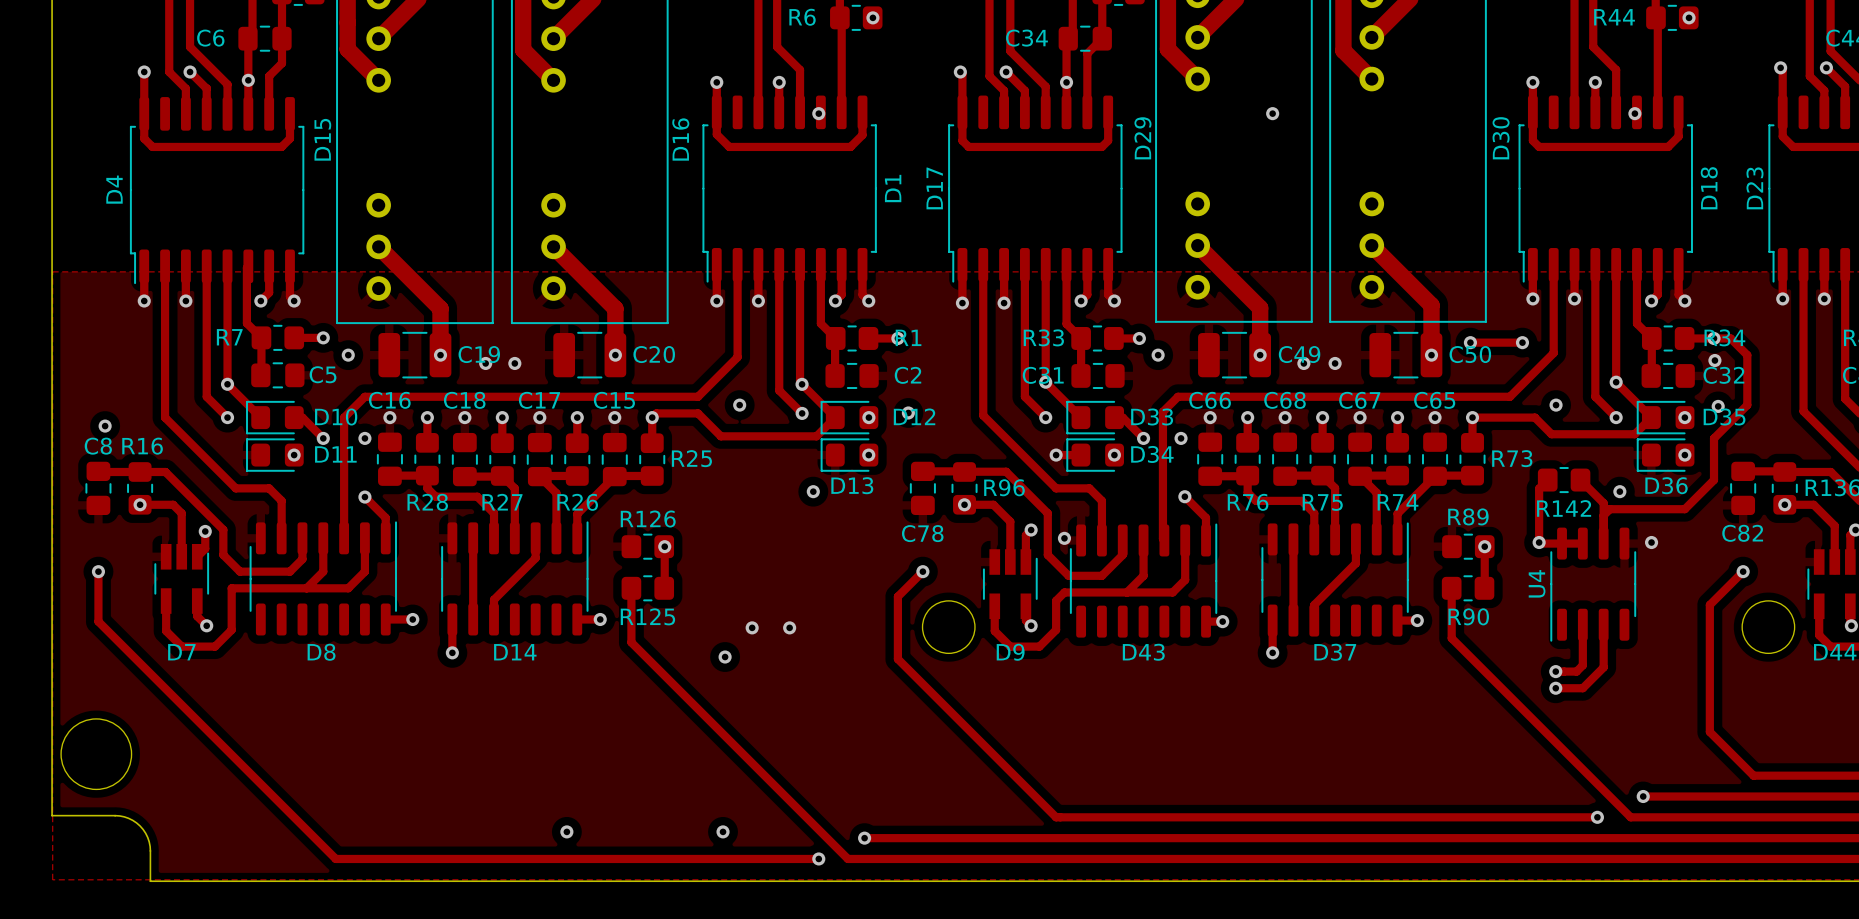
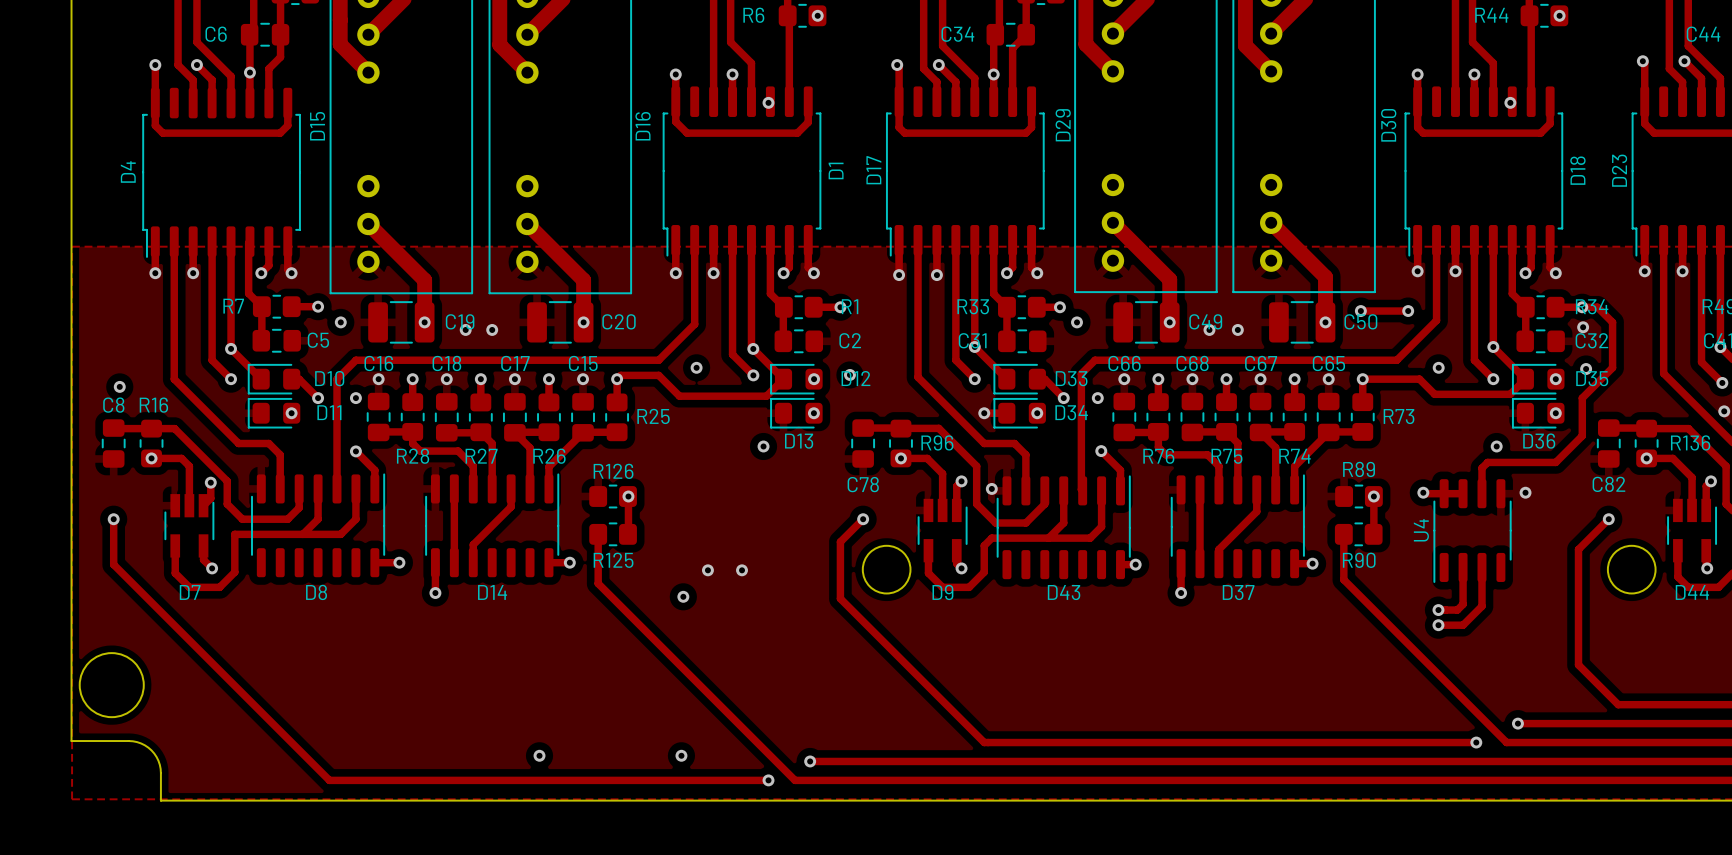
via: (1272, 113) -> none
track: (1547, 480) (1539, 488) (1539, 542) -> none
R142: (1564, 480) -> none
track: (1580, 480) (1603, 503) (1603, 515) -> none

